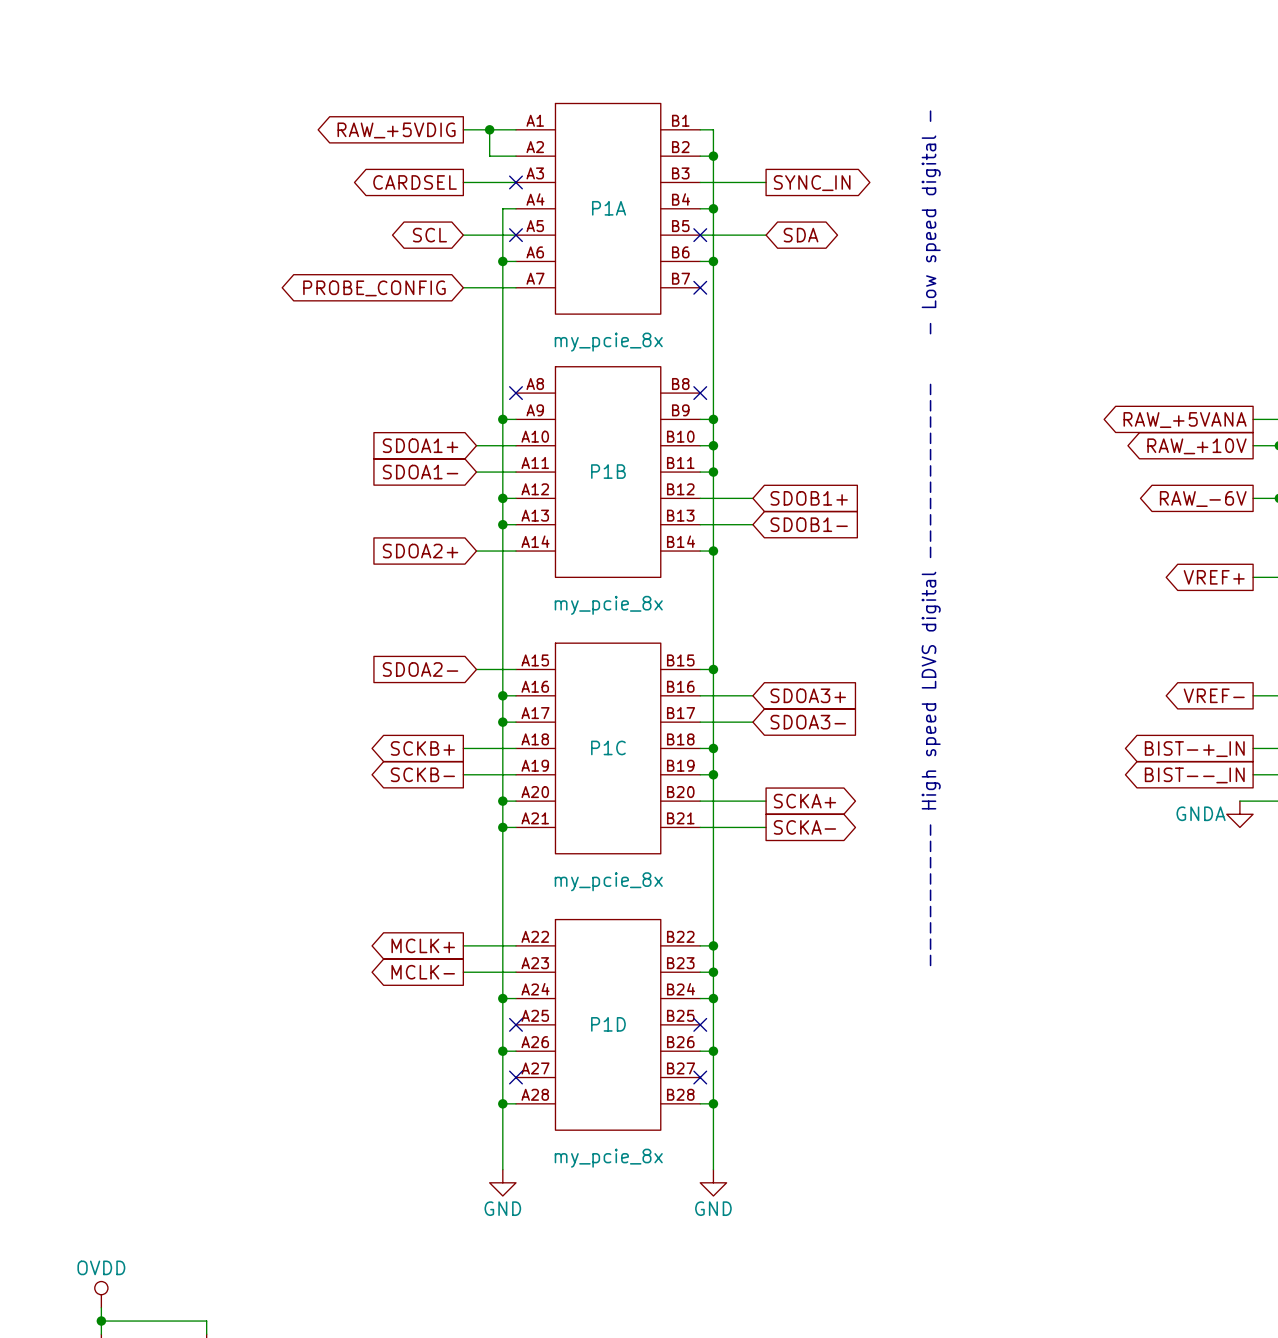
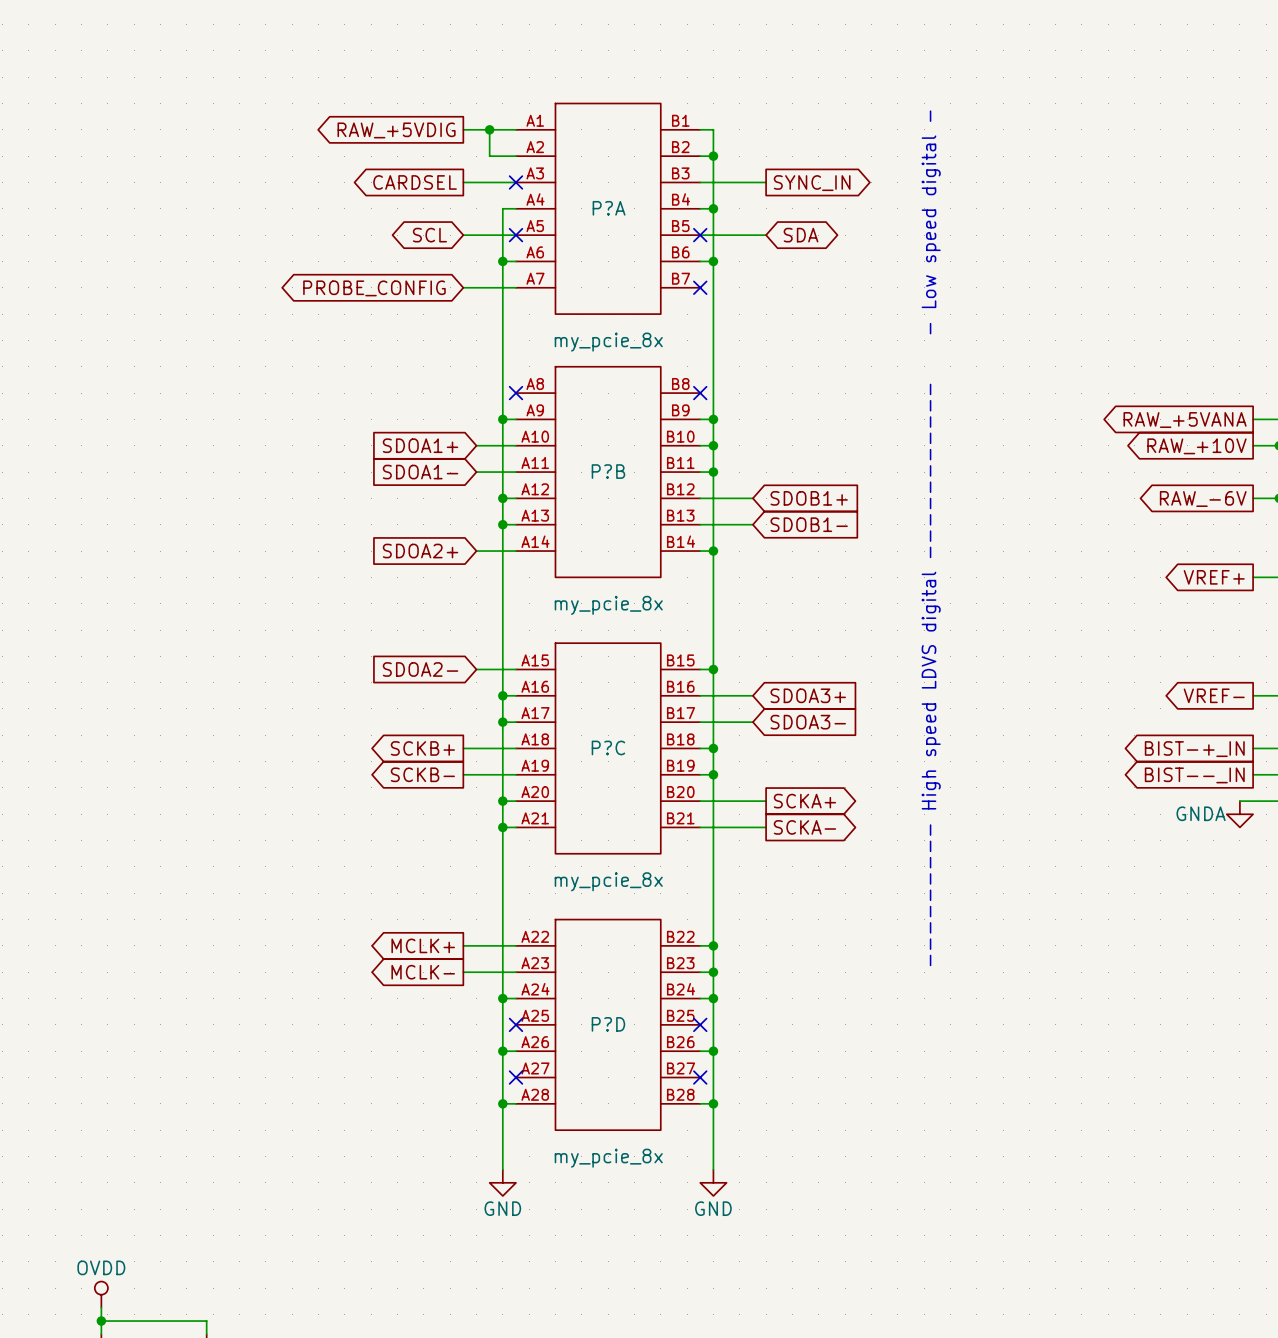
P1A name: P1A (609, 208) -> P?A (609, 208)
P1B name: P1B (608, 471) -> P?B (608, 471)
P1C name: P1C (608, 747) -> P?C (608, 747)
P1D name: P1D (608, 1024) -> P?D (608, 1024)

